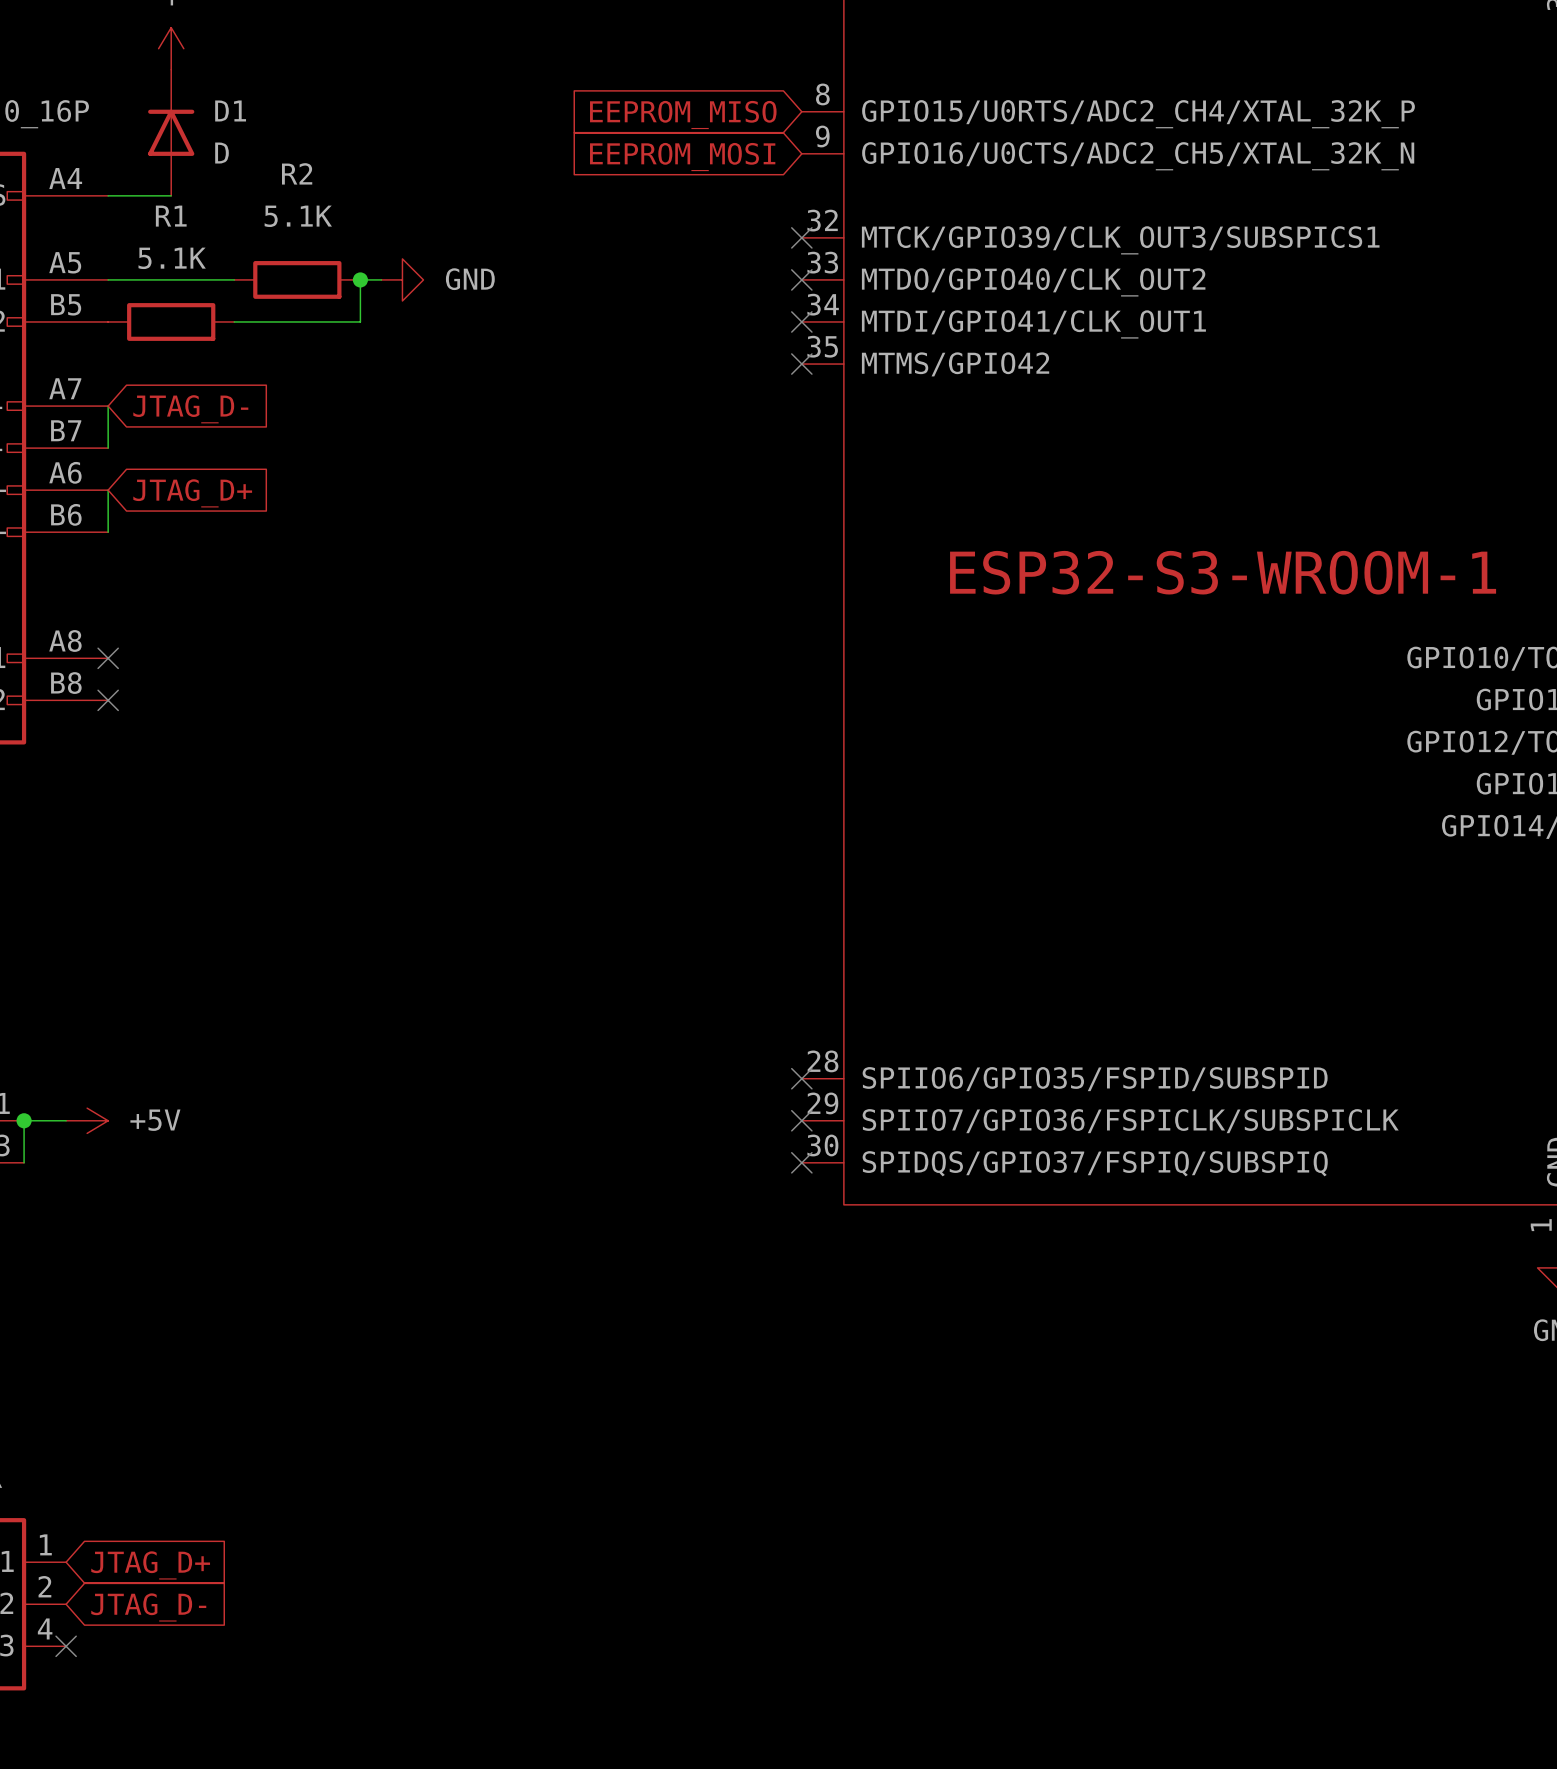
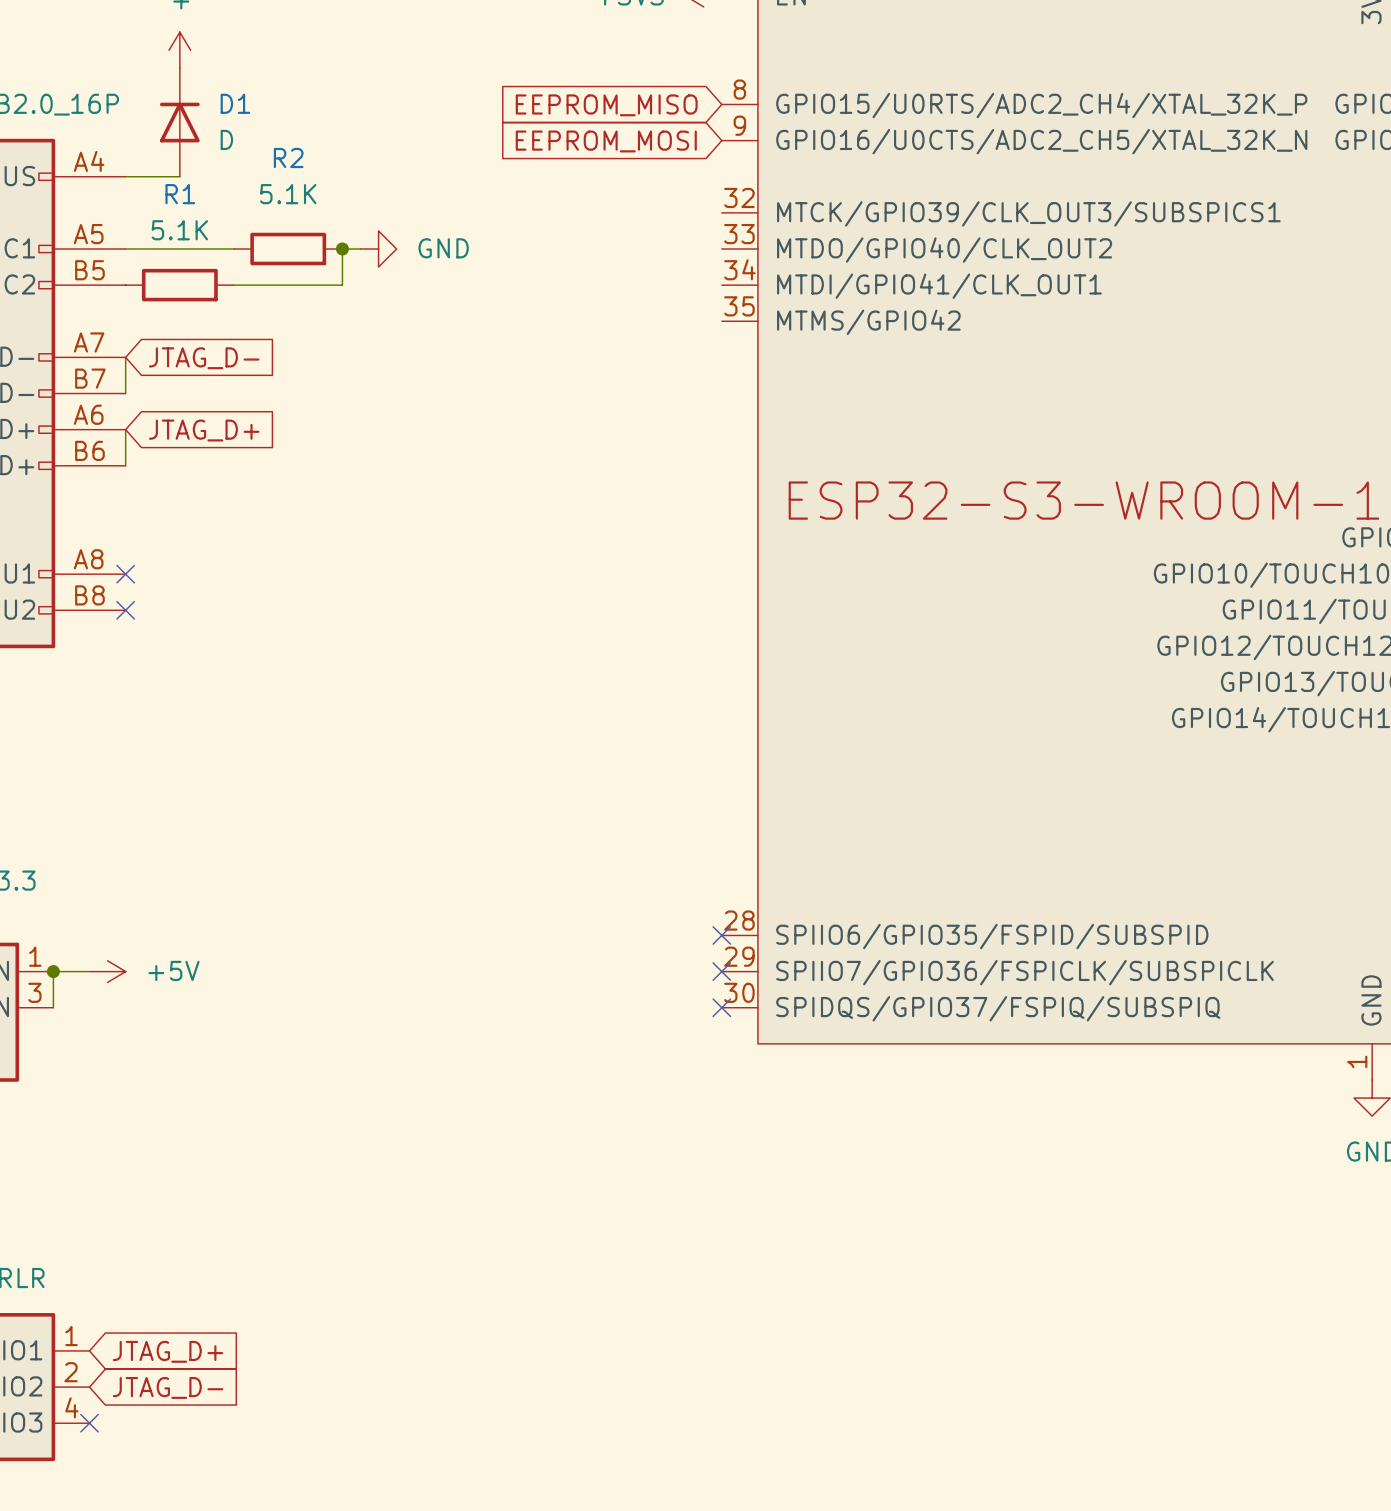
no-connect mark: (801, 237) -> none
no-connect mark: (801, 279) -> none
no-connect mark: (801, 321) -> none
no-connect mark: (801, 364) -> none

